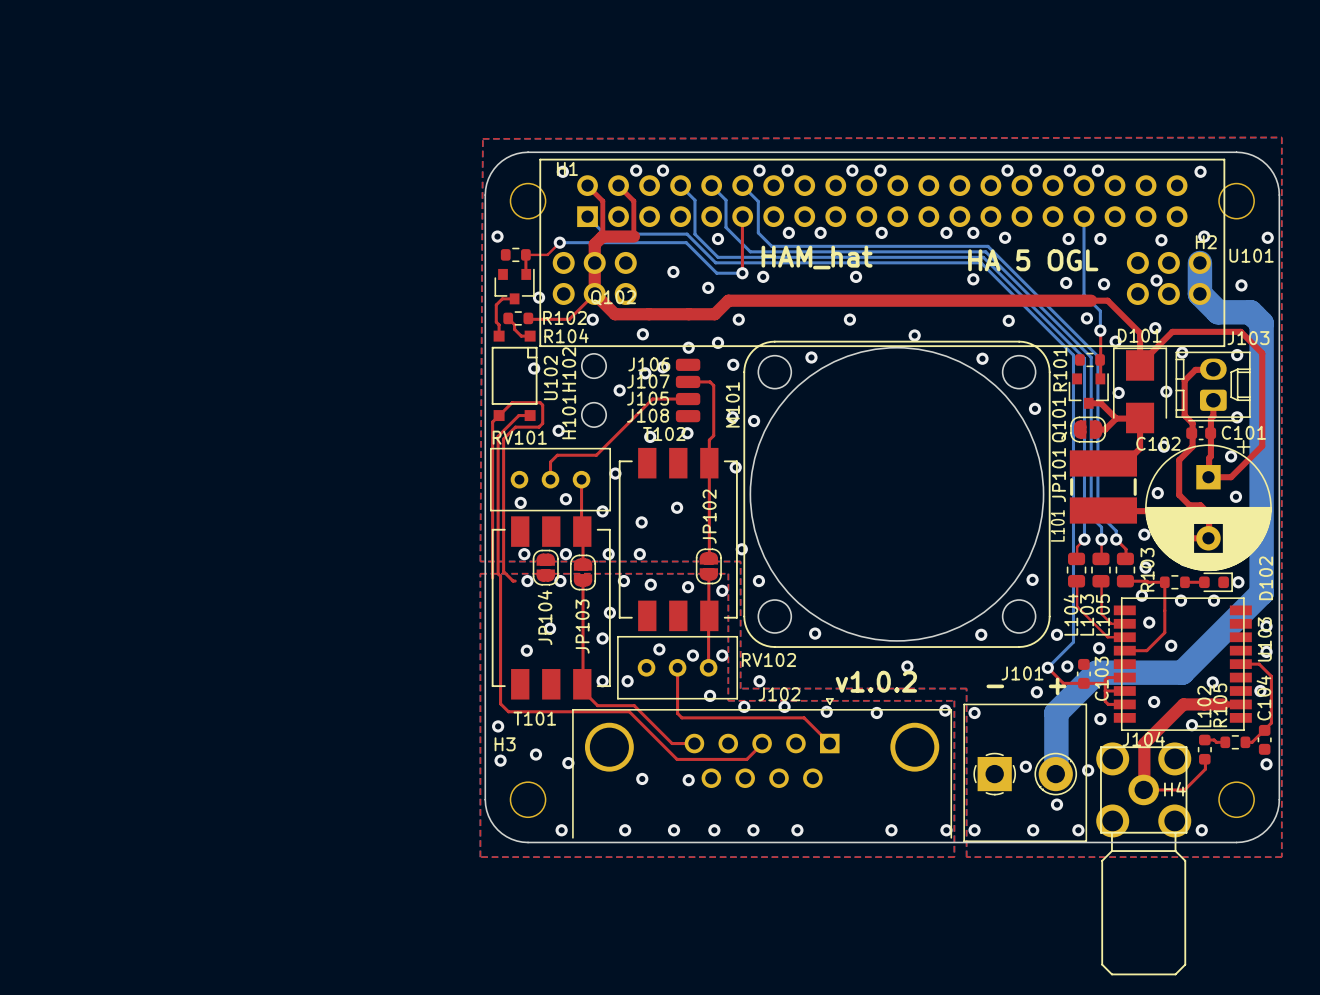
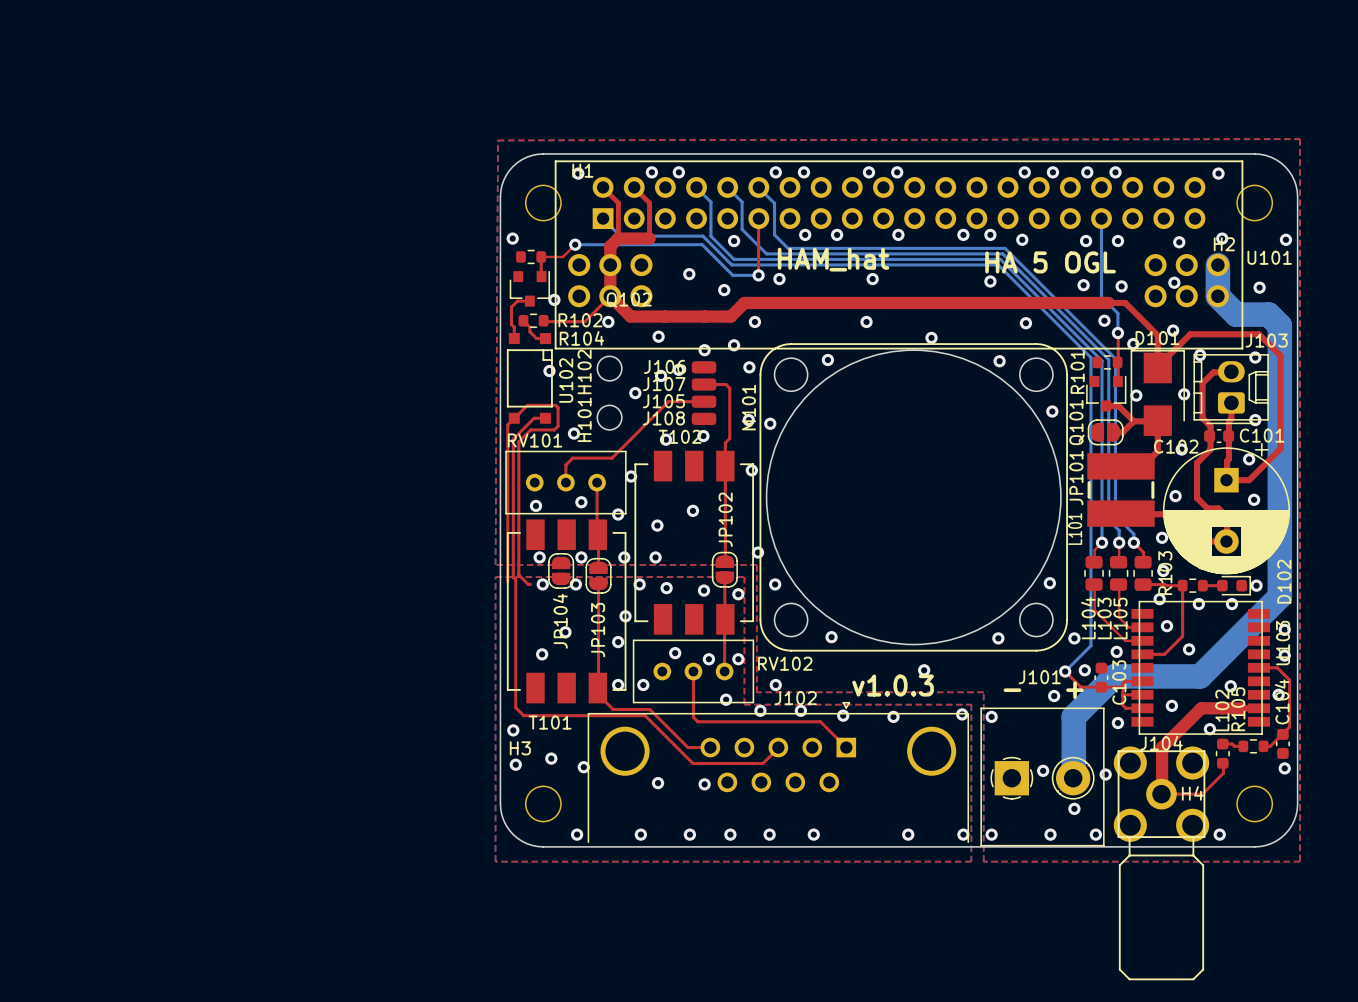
text: v1.0.2 (876, 681) -> v1.0.3 (893, 685)

